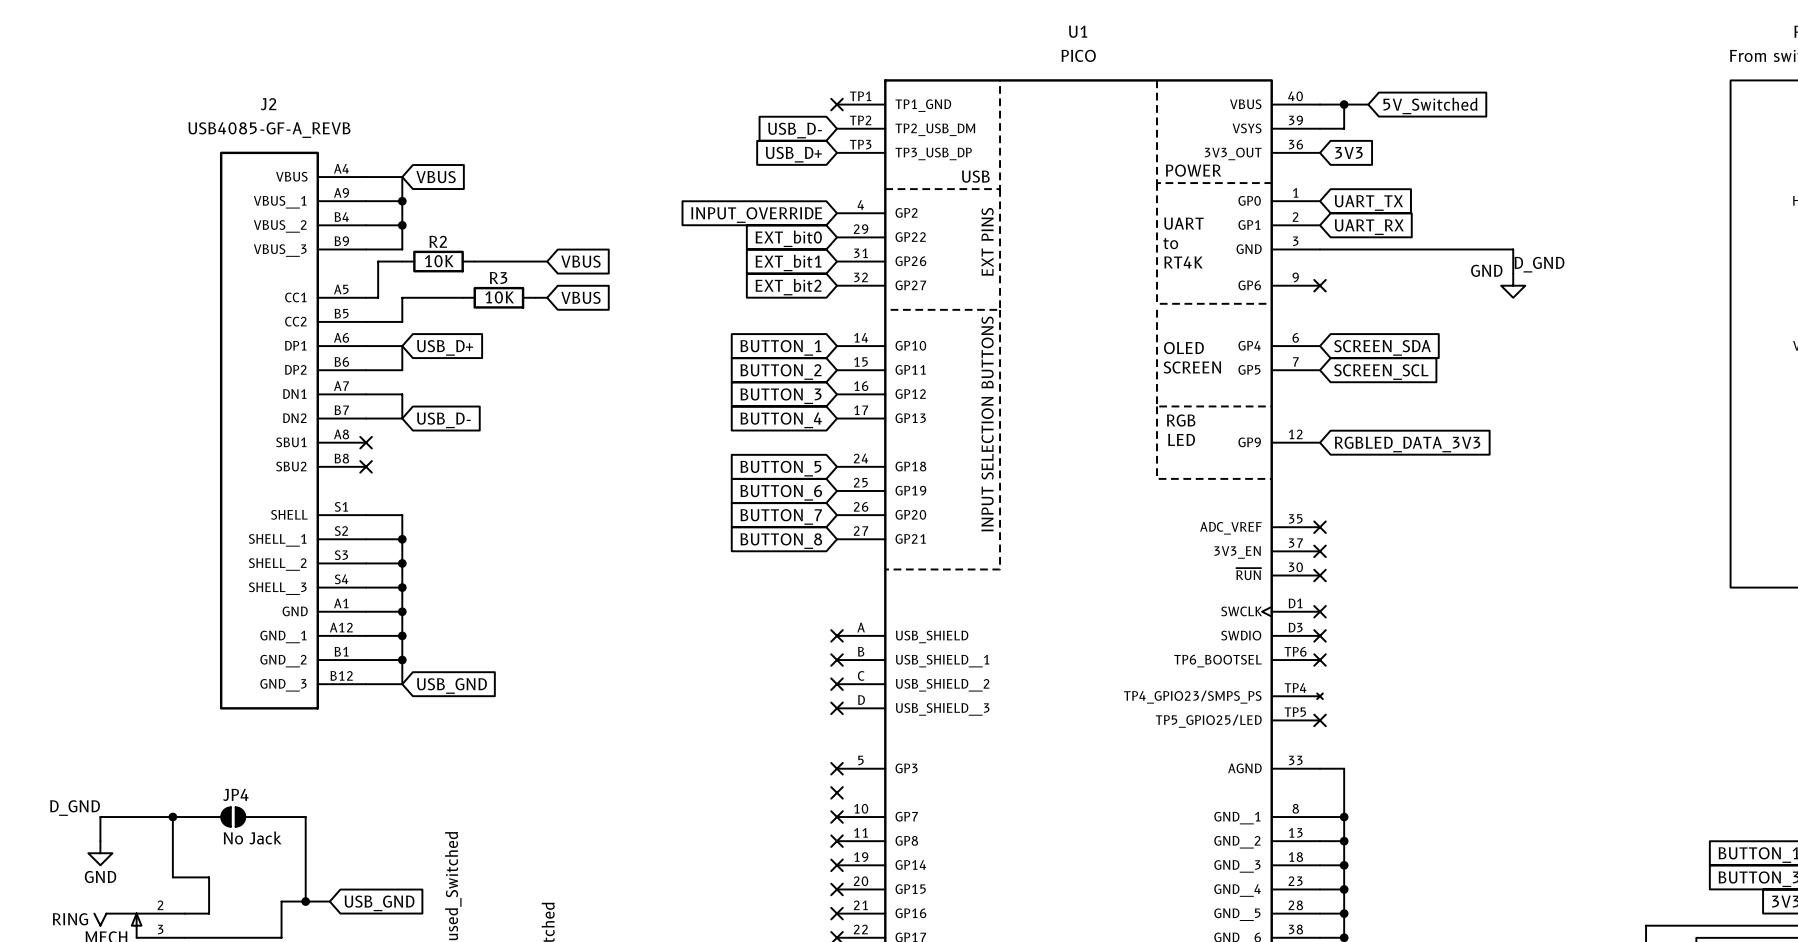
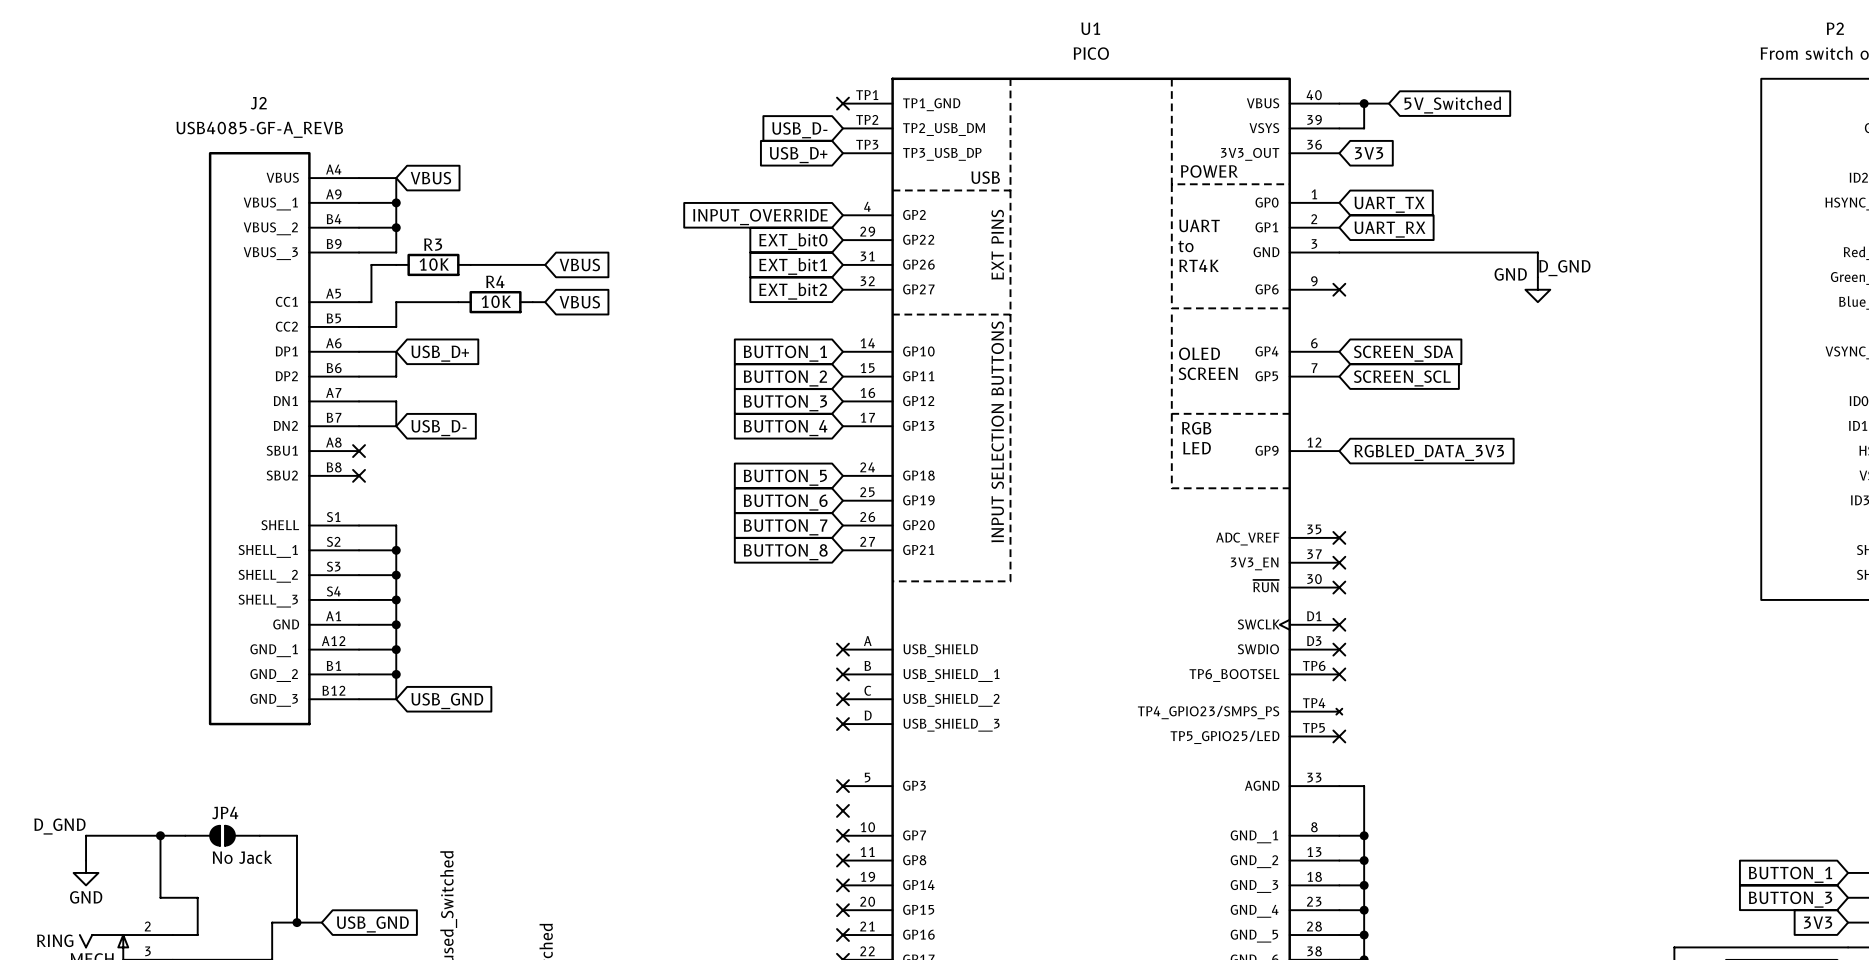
R2 name: R2 (438, 241) -> R3 (433, 244)
R3 name: R3 (498, 278) -> R4 (495, 281)

